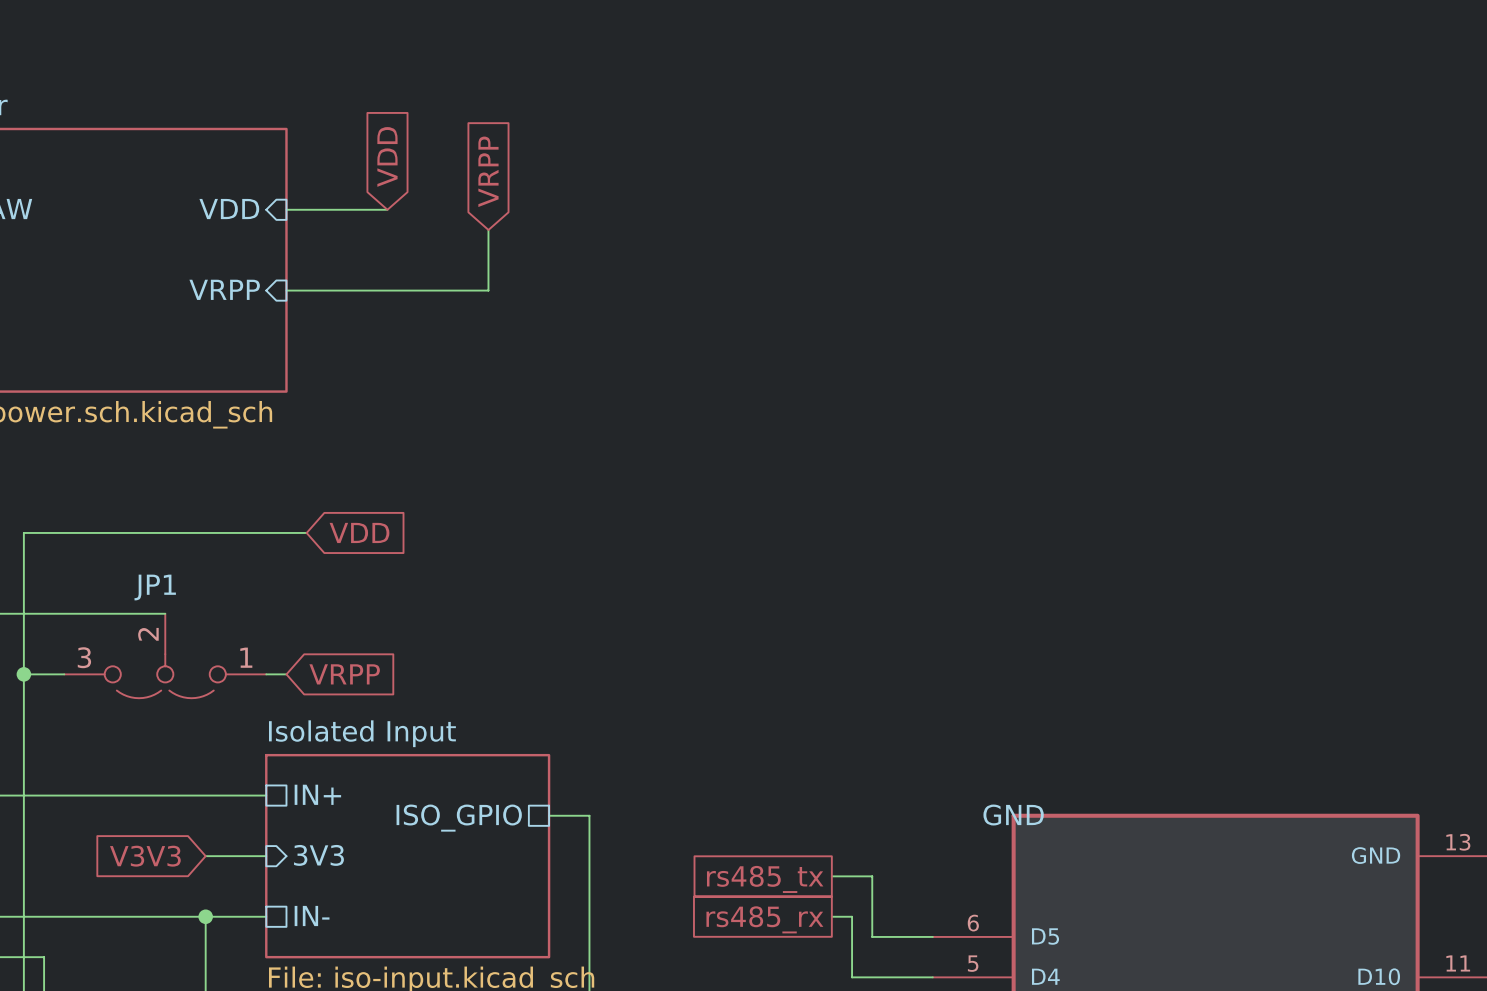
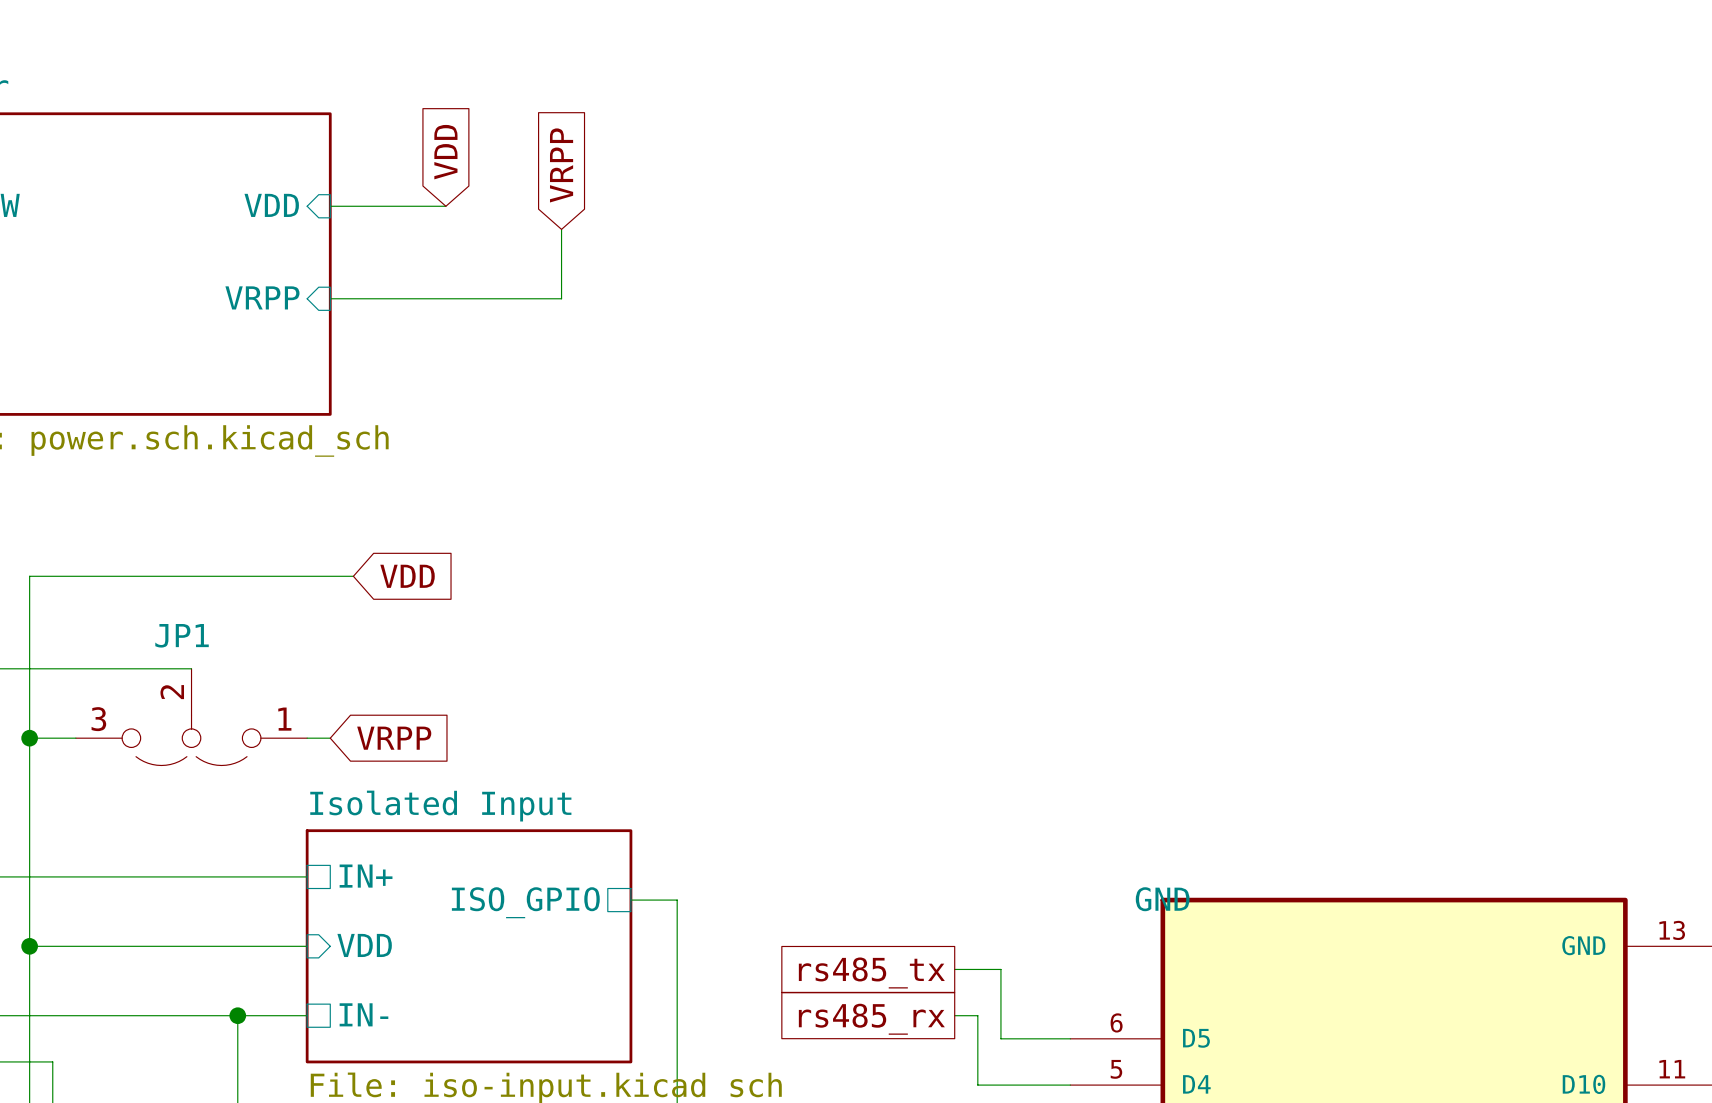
sheet pin: 3V3 (318, 855) -> VDD (364, 945)
wire: none -> (29, 946) (237, 946)
junction: none -> (29, 946)
global label: V3V3 (145, 856) -> none

